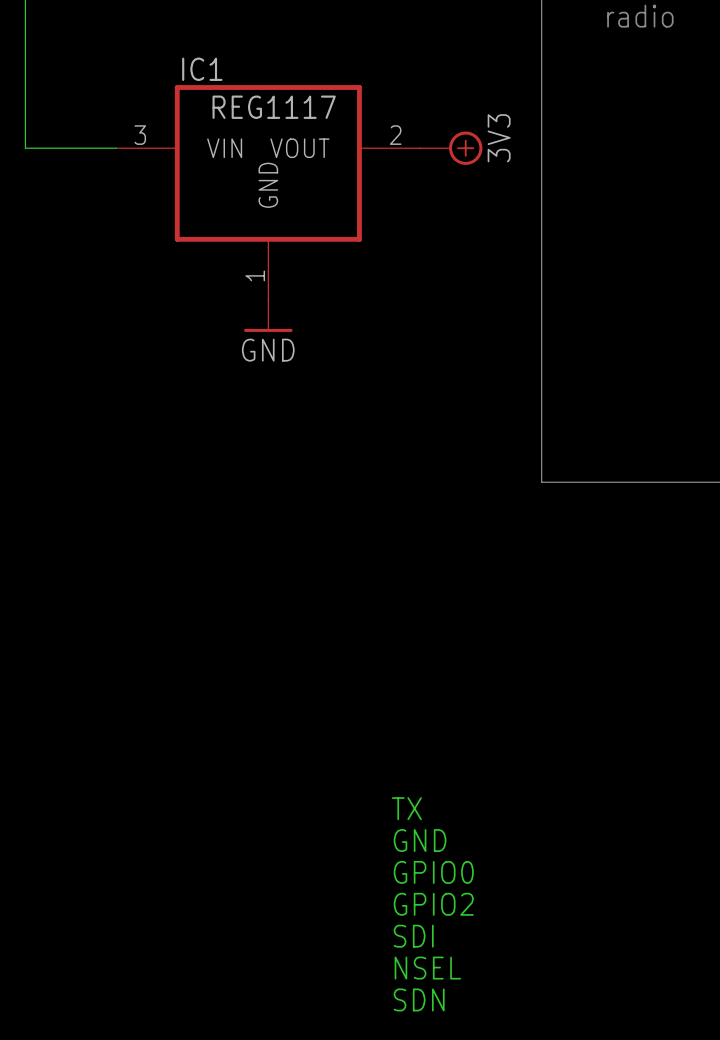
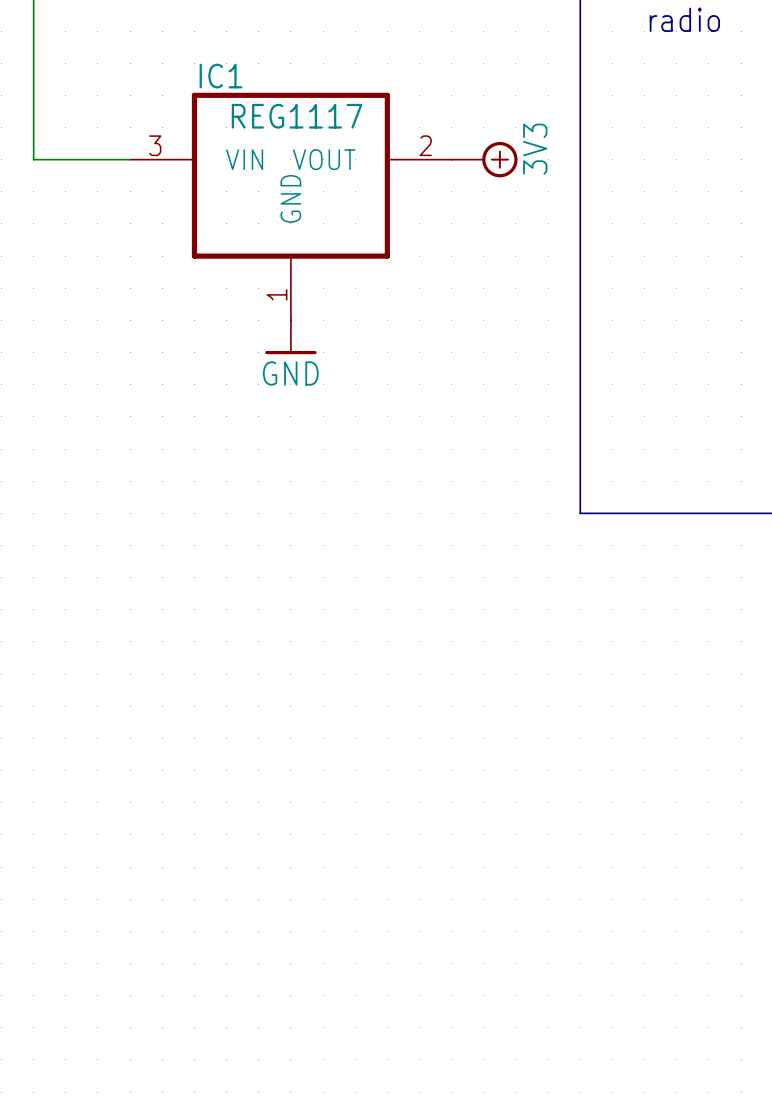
text: TX (406, 808) -> none
text: GND (420, 840) -> none
text: GPIO0 (433, 872) -> none
text: GPIO2 (433, 904) -> none
text: SDI (413, 936) -> none
text: NSEL (427, 968) -> none
text: SDN (419, 999) -> none

